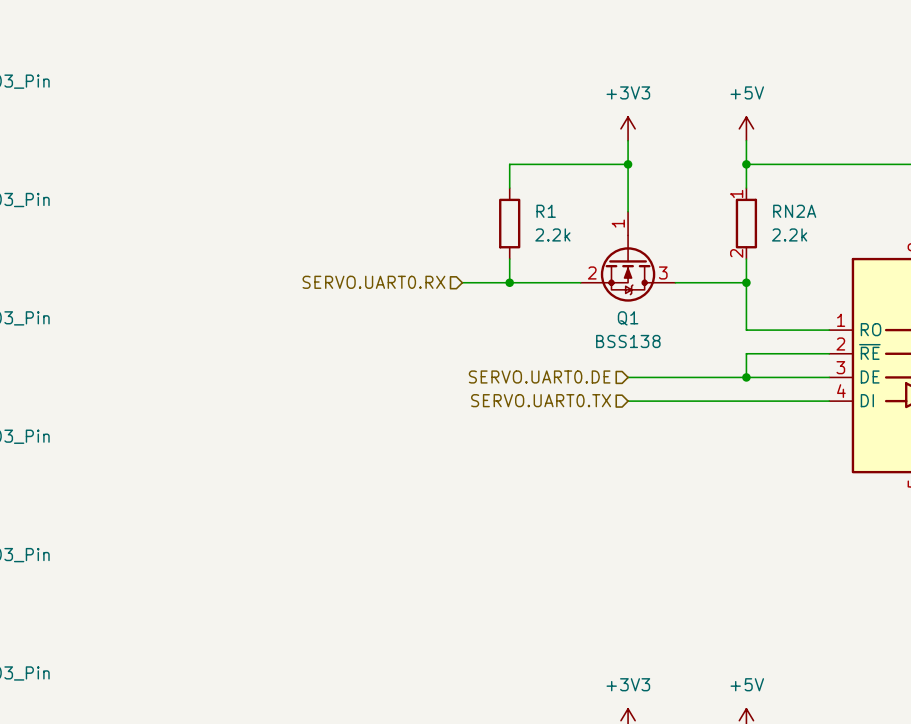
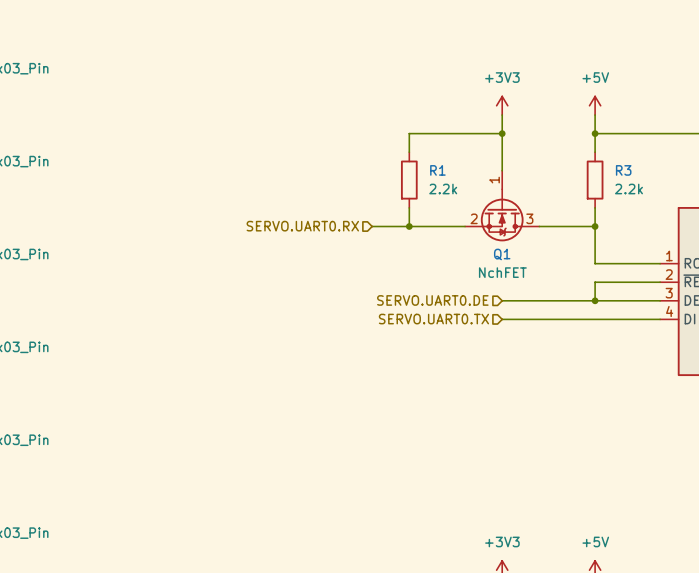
RN2A pin number: 1 (736, 193) -> none
RN2A name: RN2A (794, 211) -> R3 (623, 170)
RN2A pin number: 2 (736, 253) -> none
Q1 value: BSS138 (628, 341) -> NchFET (502, 272)

